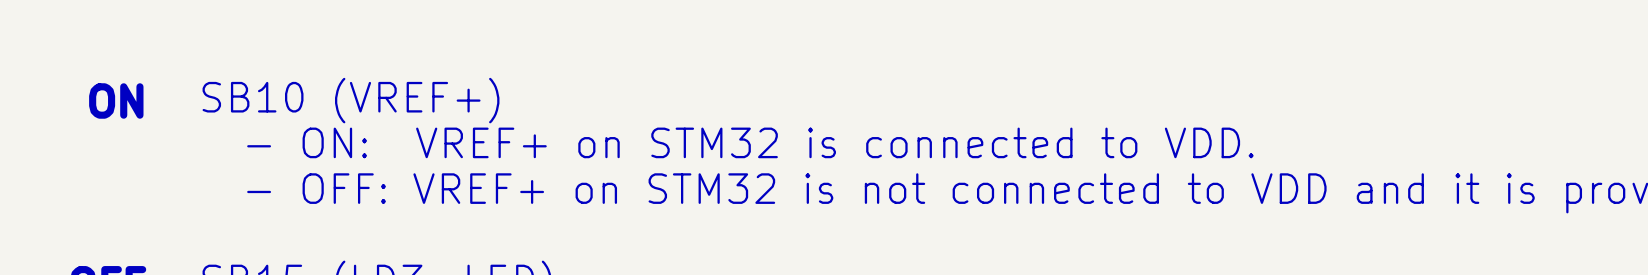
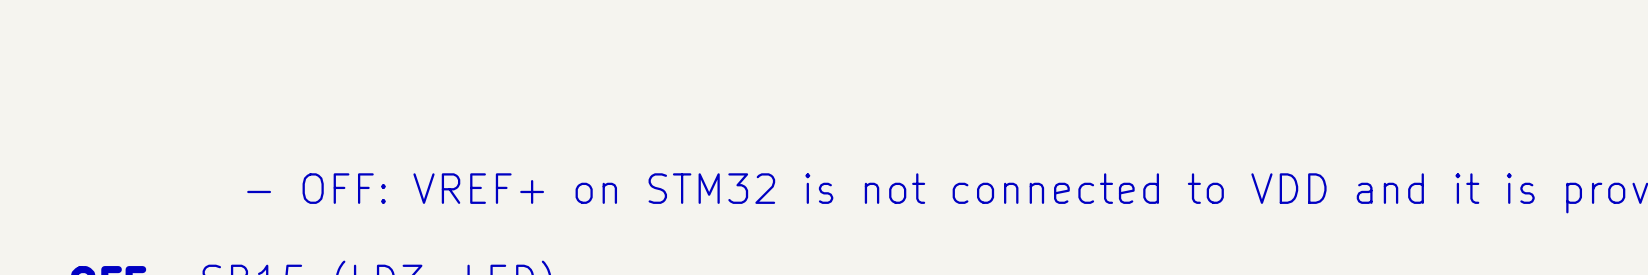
text: ON (116, 100) -> none
text: SB10 (VREF+) (351, 100) -> none
text: - ON: VREF+ on STM32 is connected to VDD. (750, 142) -> none

